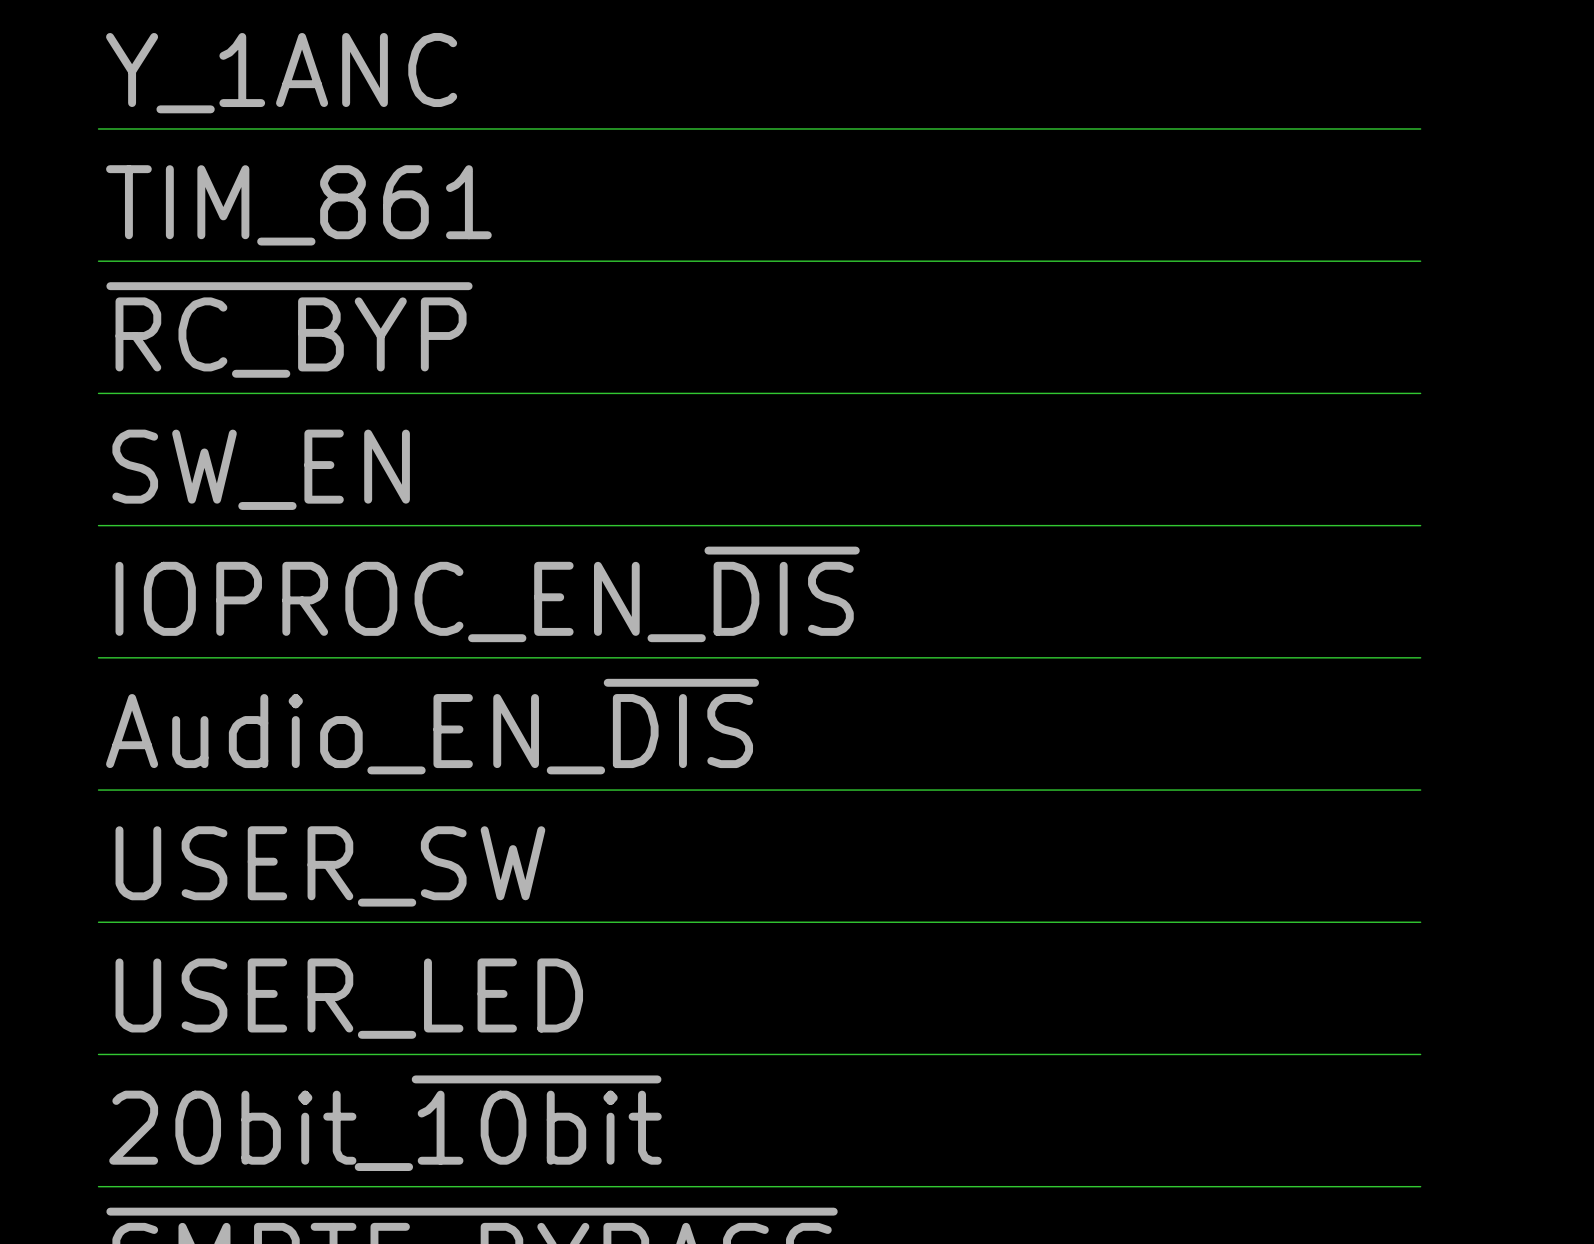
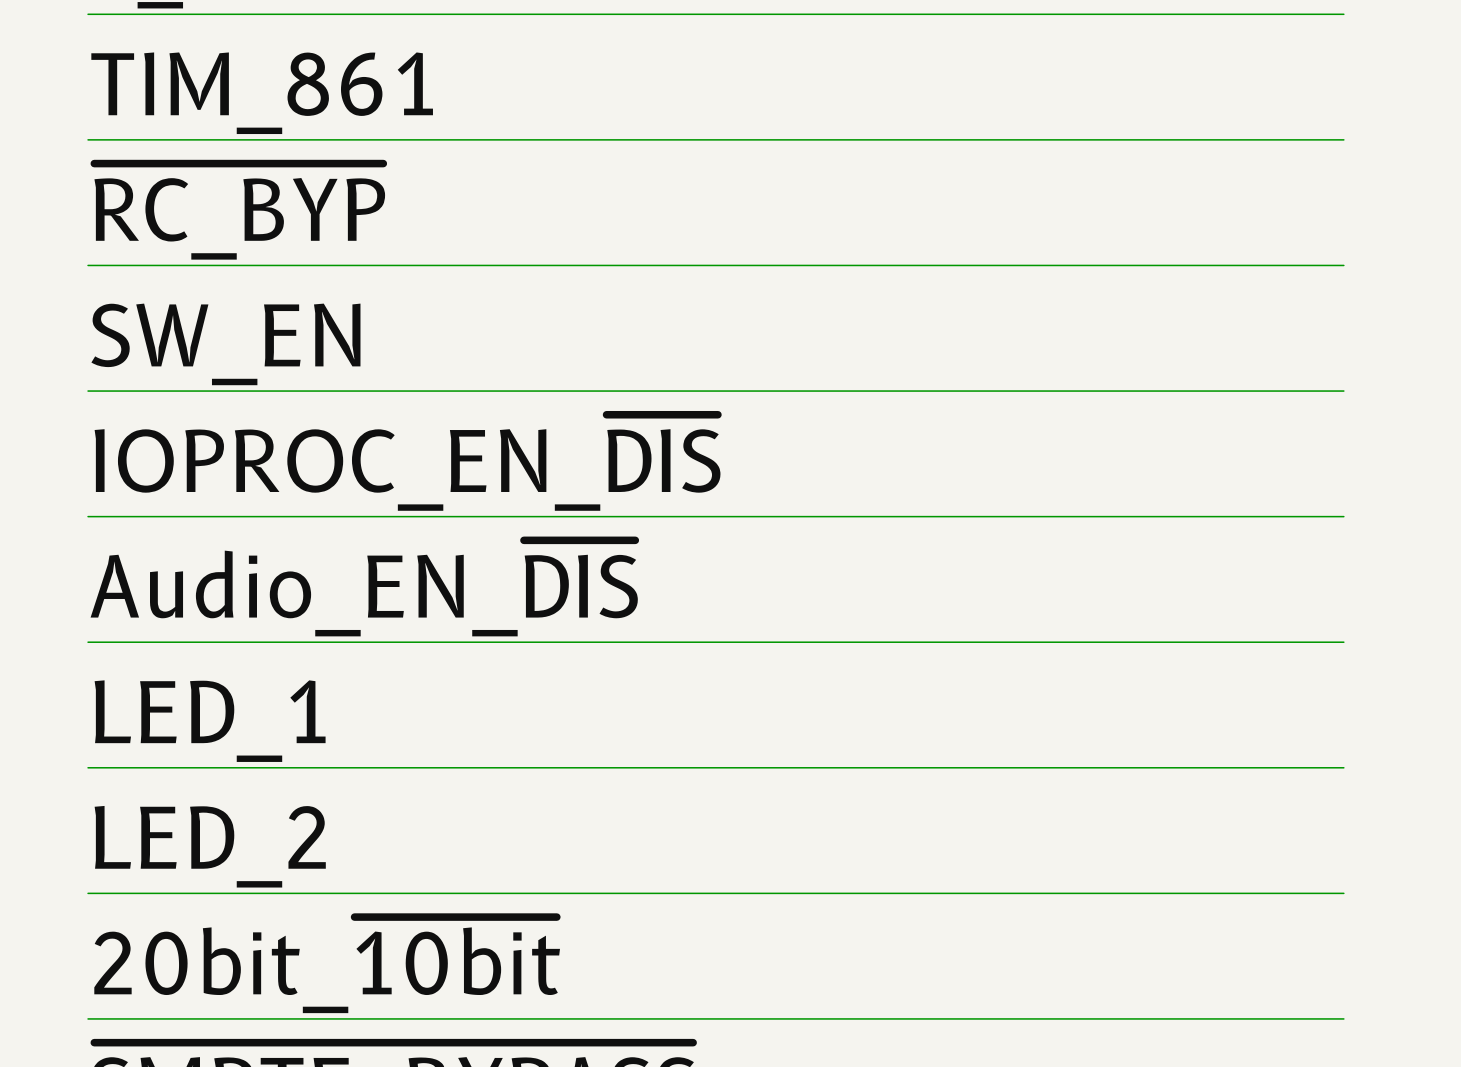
label: USER_SW (330, 866) -> LED_1 (210, 721)
label: USER_LED (349, 998) -> LED_2 (210, 846)

